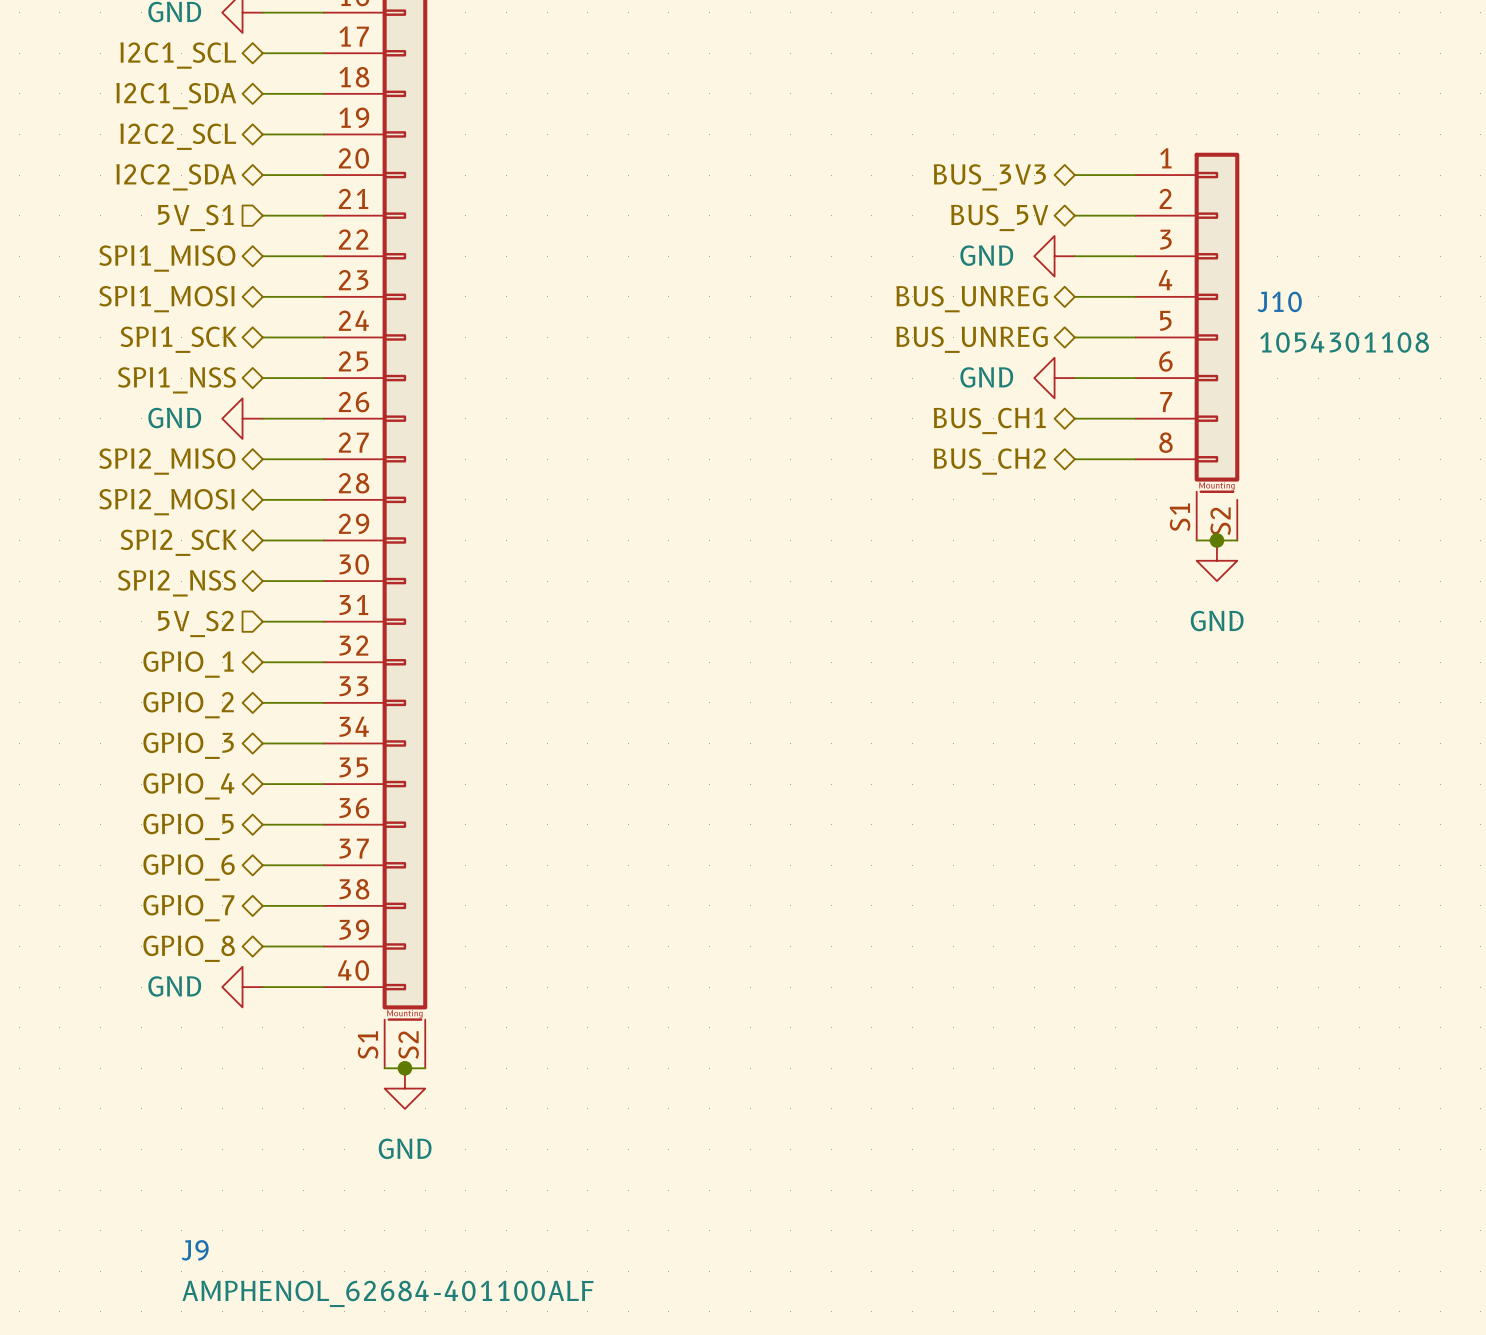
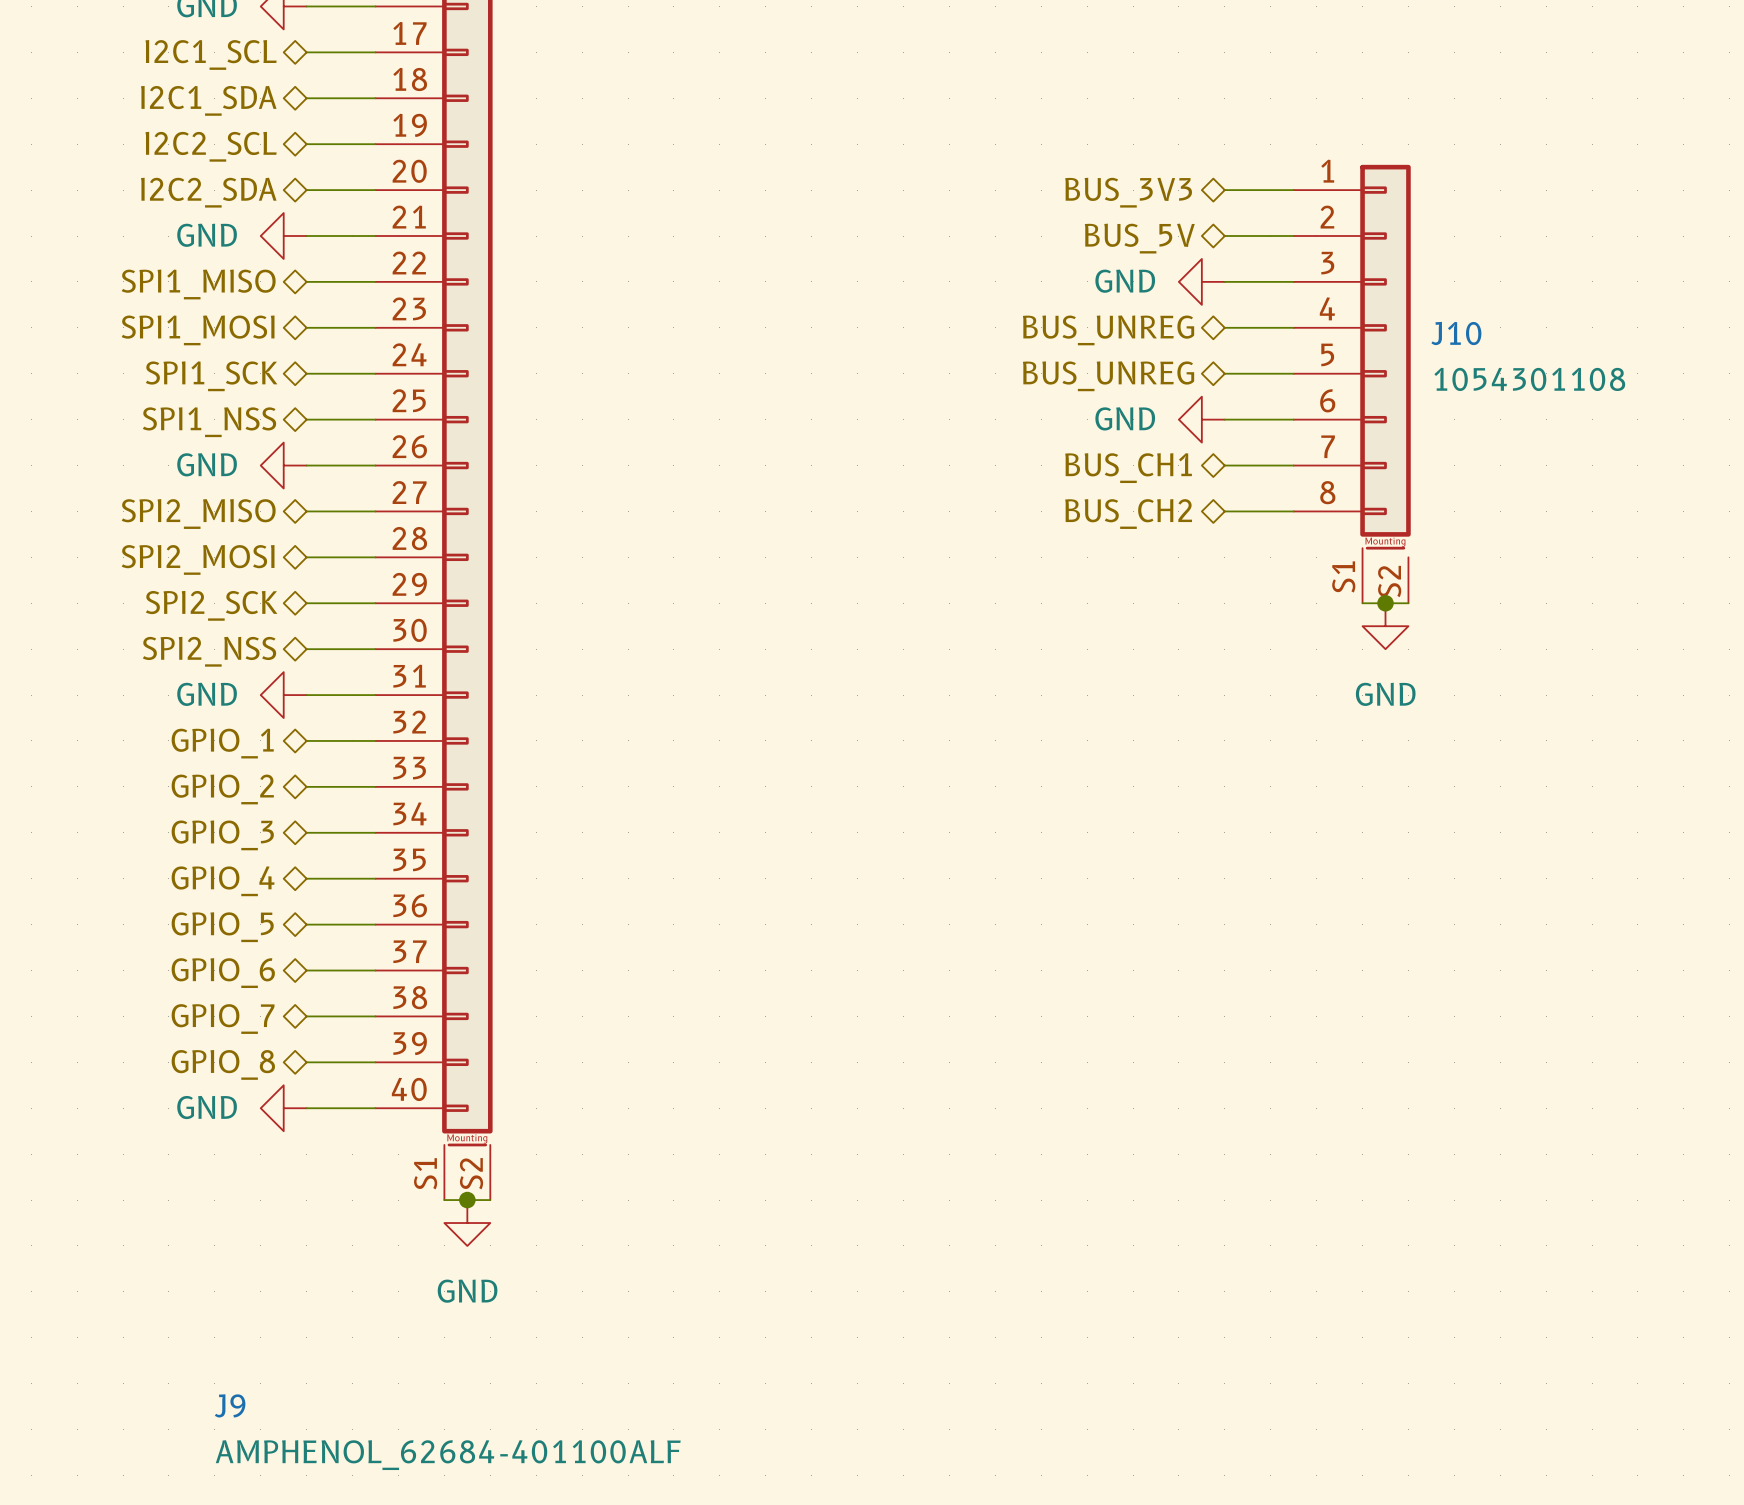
power symbol: none -> GND (283, 236)
hierarchical label: 5V_S1 (195, 217) -> none
power symbol: none -> GND (283, 695)
hierarchical label: 5V_S2 (196, 623) -> none

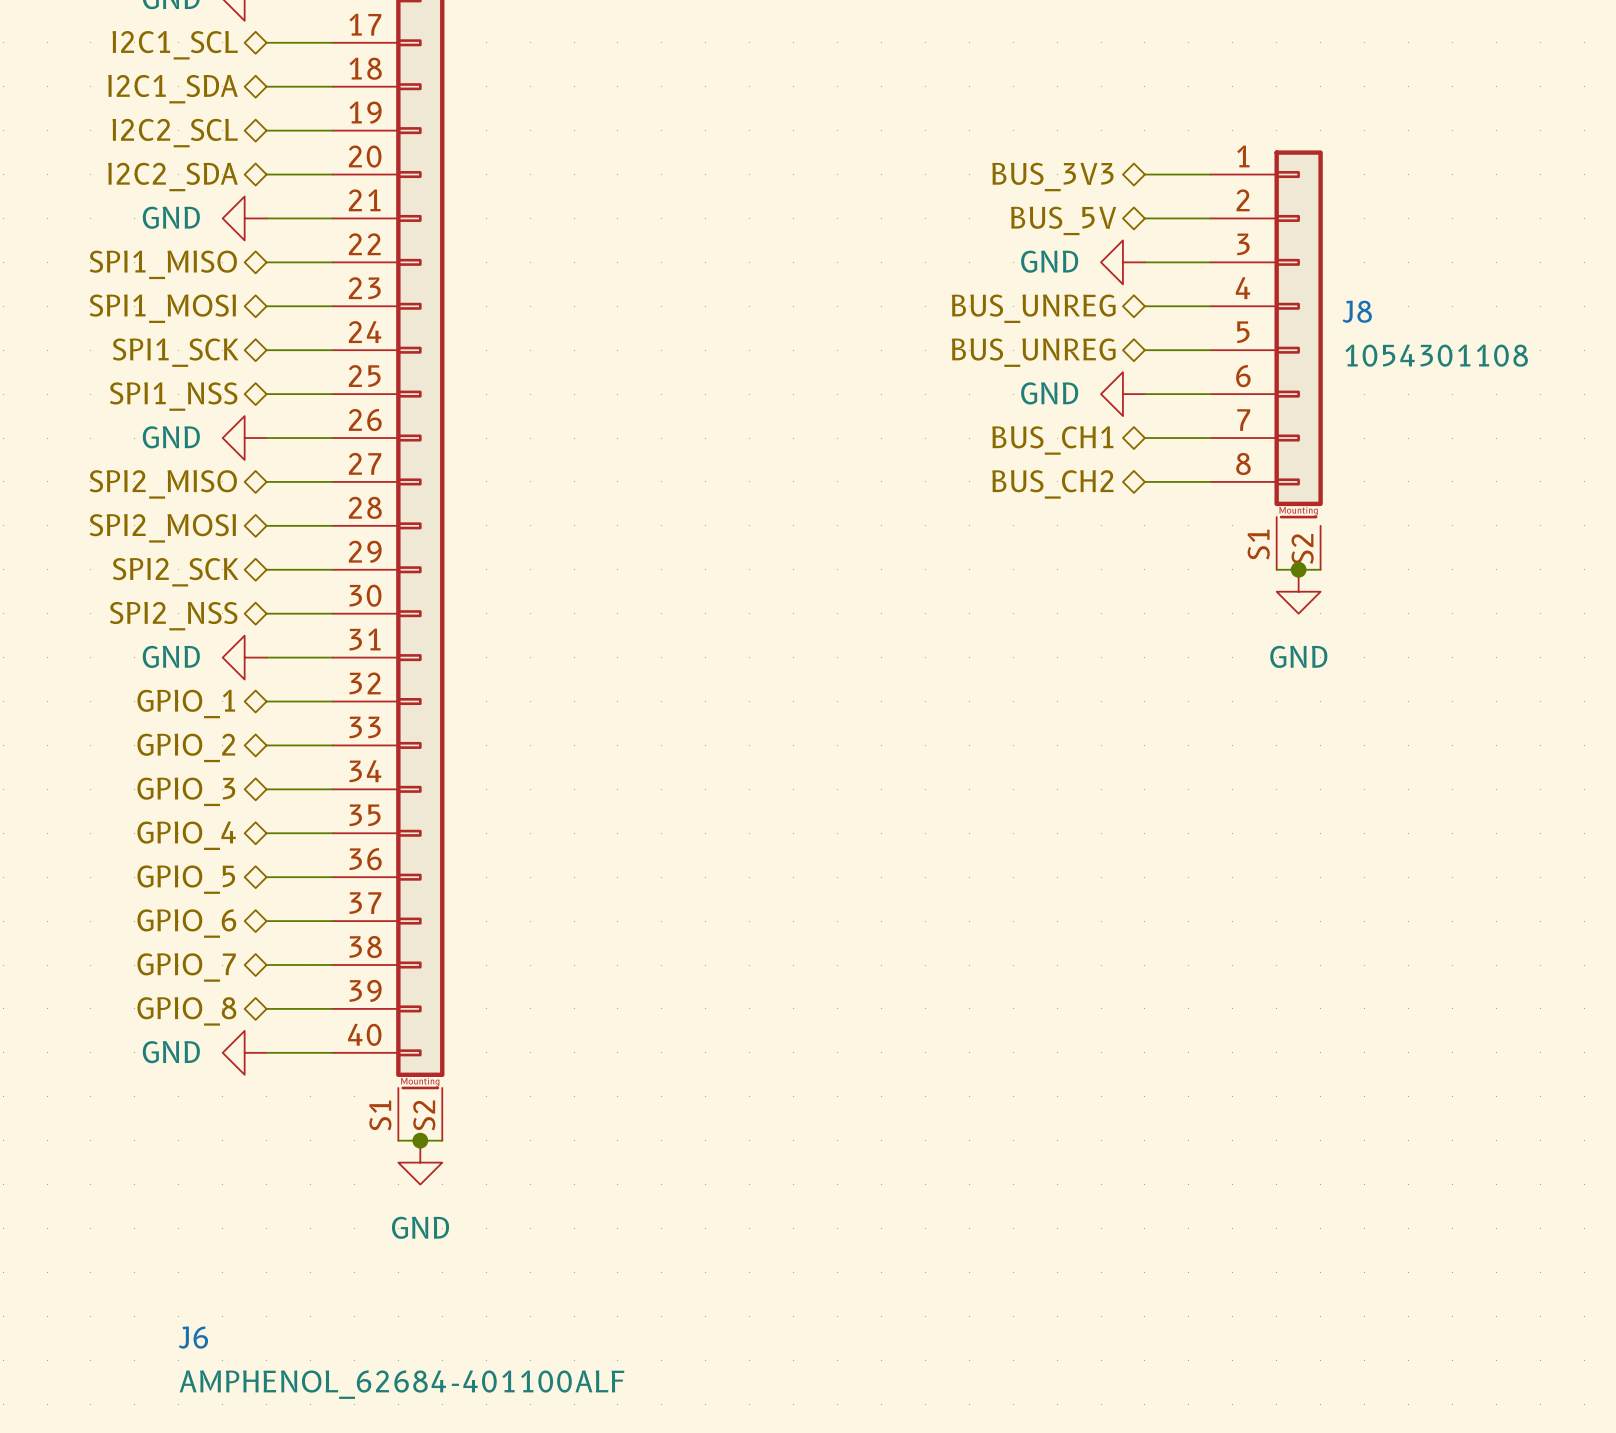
J10 name: J10 (1456, 333) -> J8 (1357, 311)
J9 name: J9 (230, 1405) -> J6 (193, 1337)

